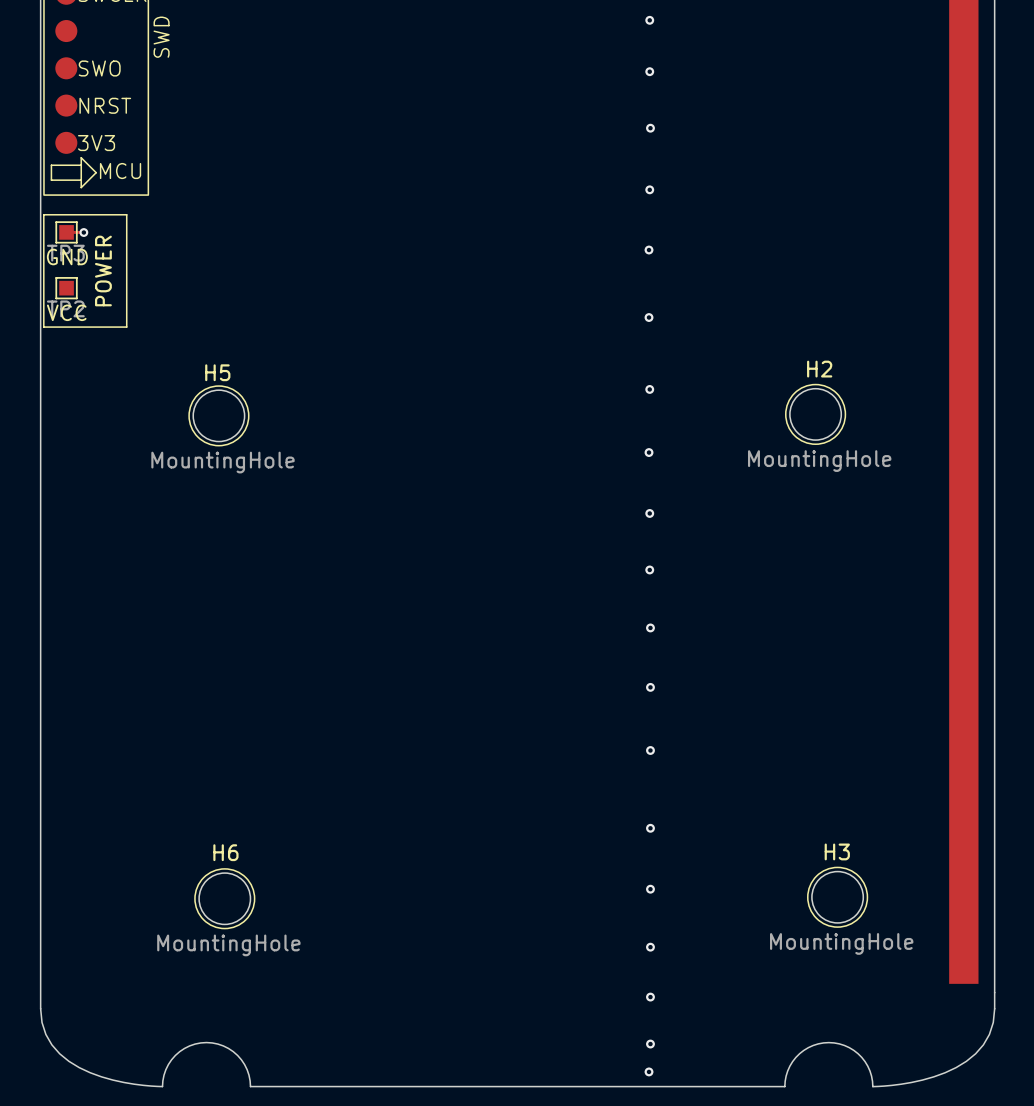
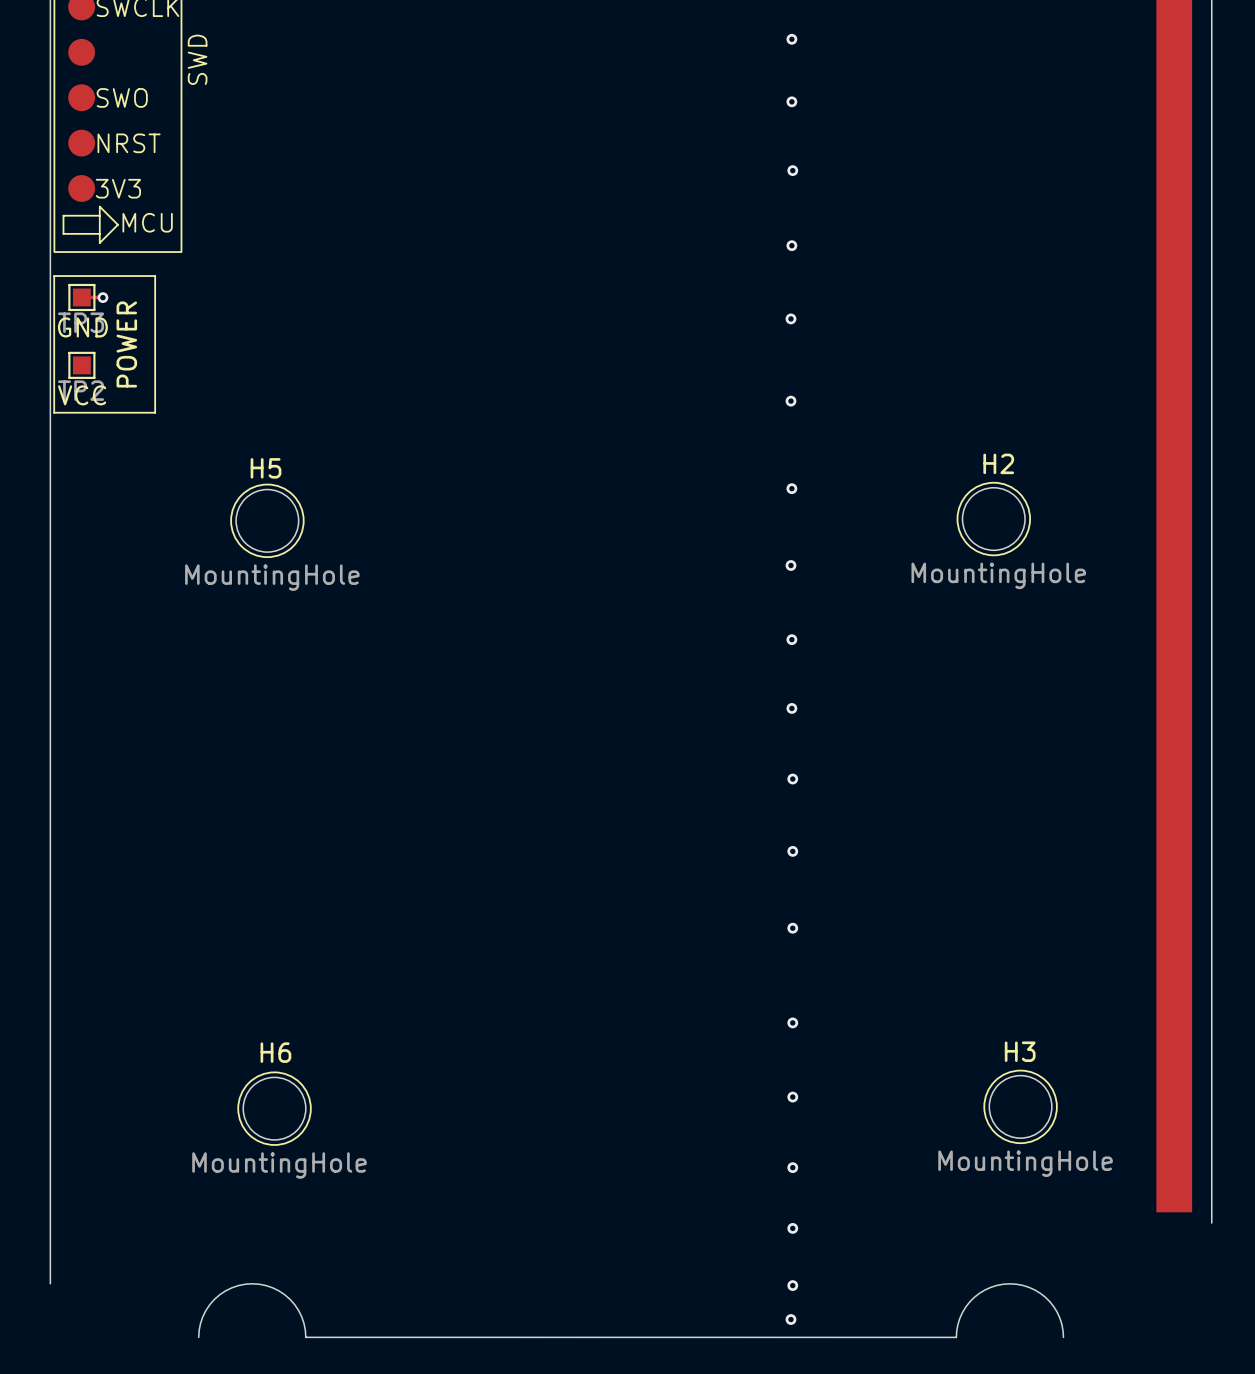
board edge: (994, 992) (993, 1022) (989, 1034) (983, 1044) (966, 1061) (945, 1072) (922, 1080) (872, 1086) -> none
board edge: (40, 1008) (45, 1034) (51, 1044) (68, 1061) (90, 1072) (112, 1080) (162, 1086) -> (50, 1242) (50, 1283)

